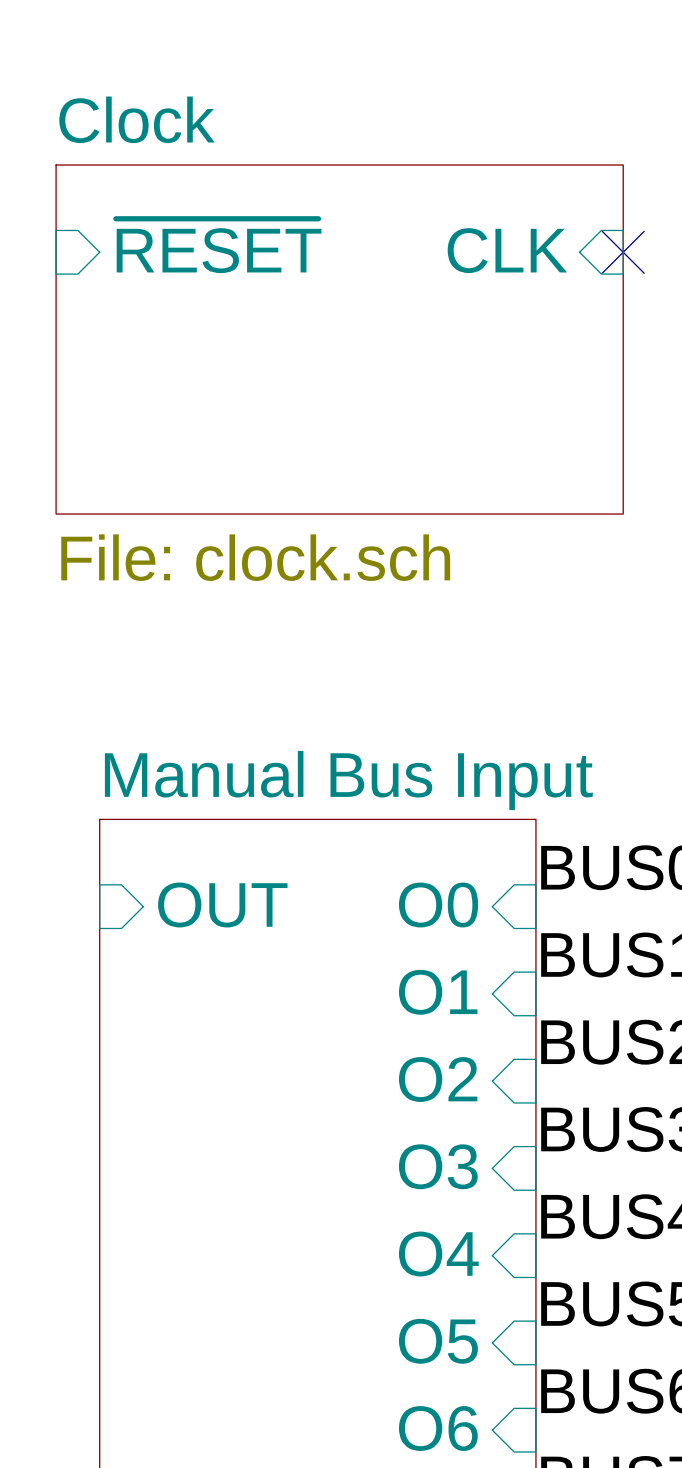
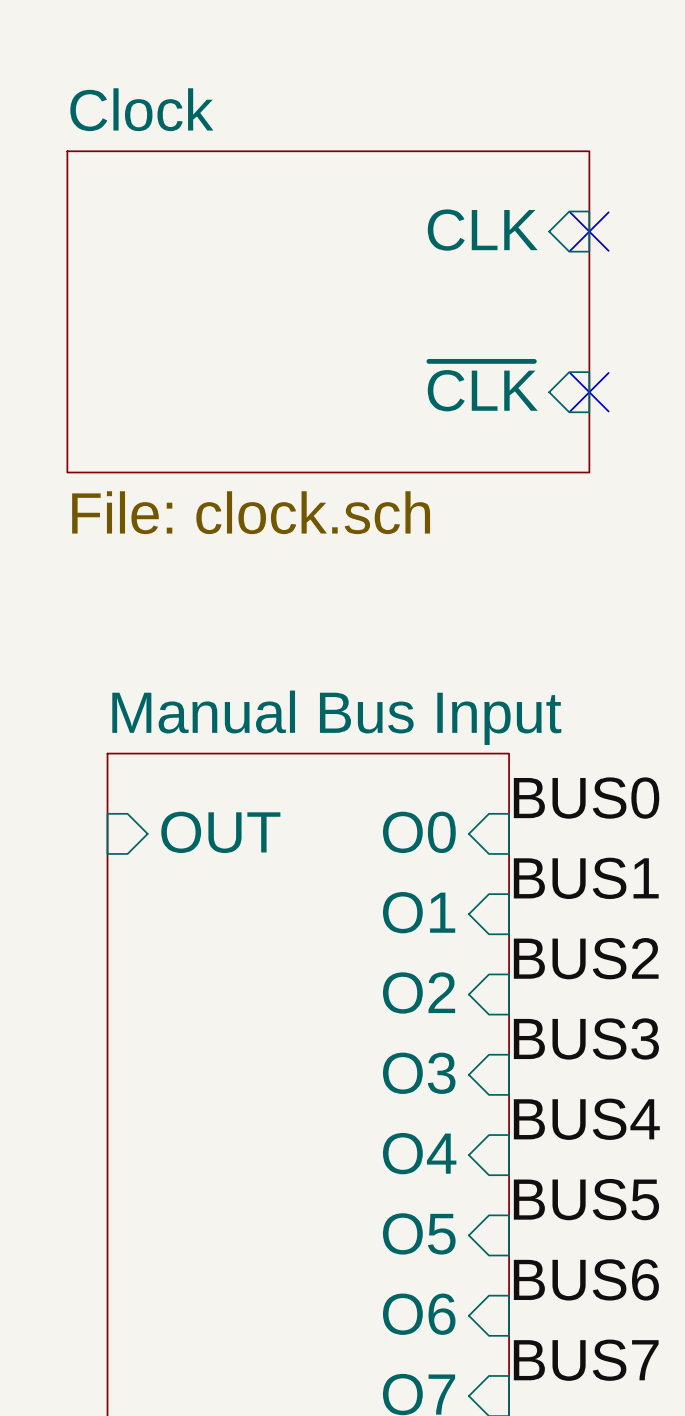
sheet pin: ~{RESET} (218, 245) -> none
sheet pin: none -> ~{CLK} (482, 386)
no-connect mark: none -> (589, 392)

